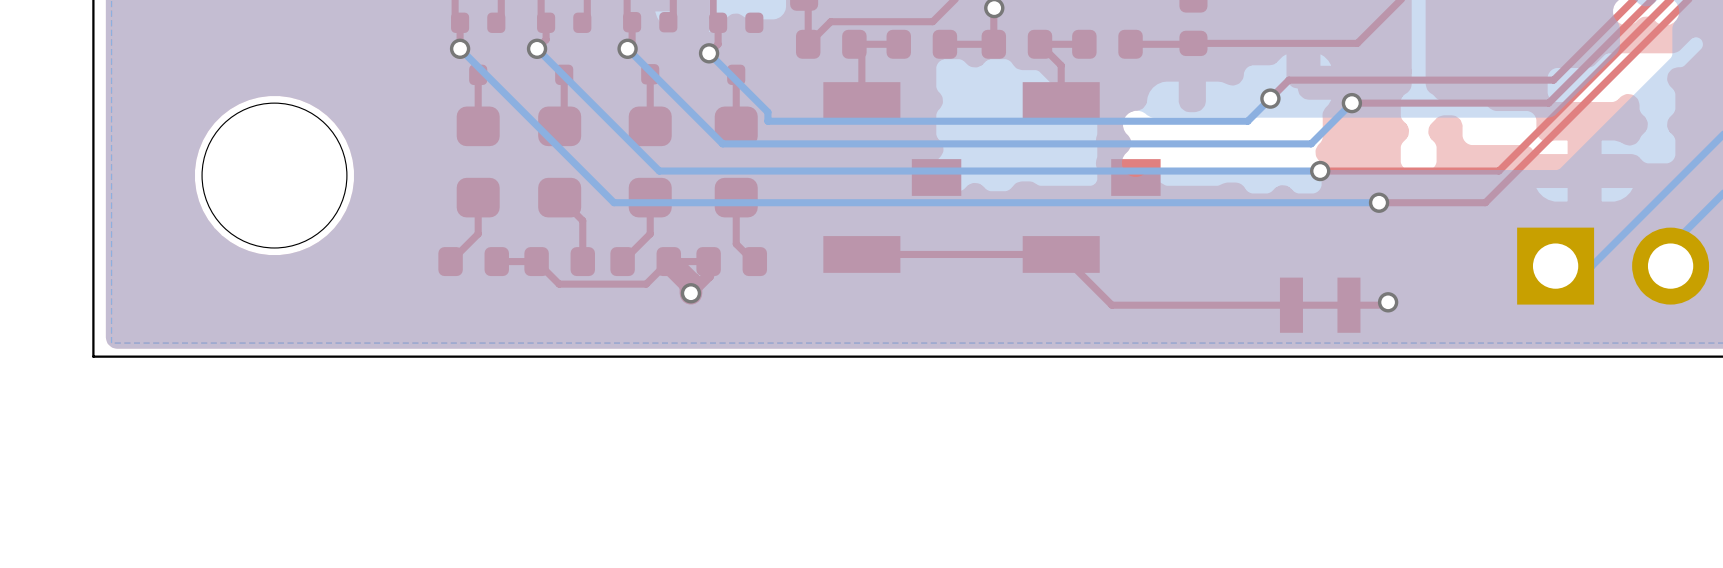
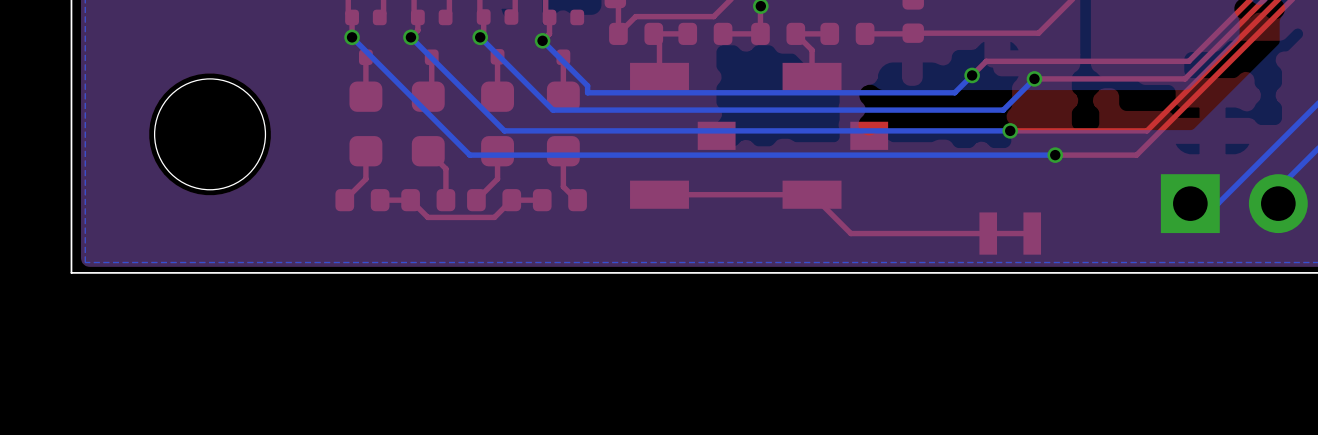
via: (690, 293) -> none
via: (1388, 302) -> none

